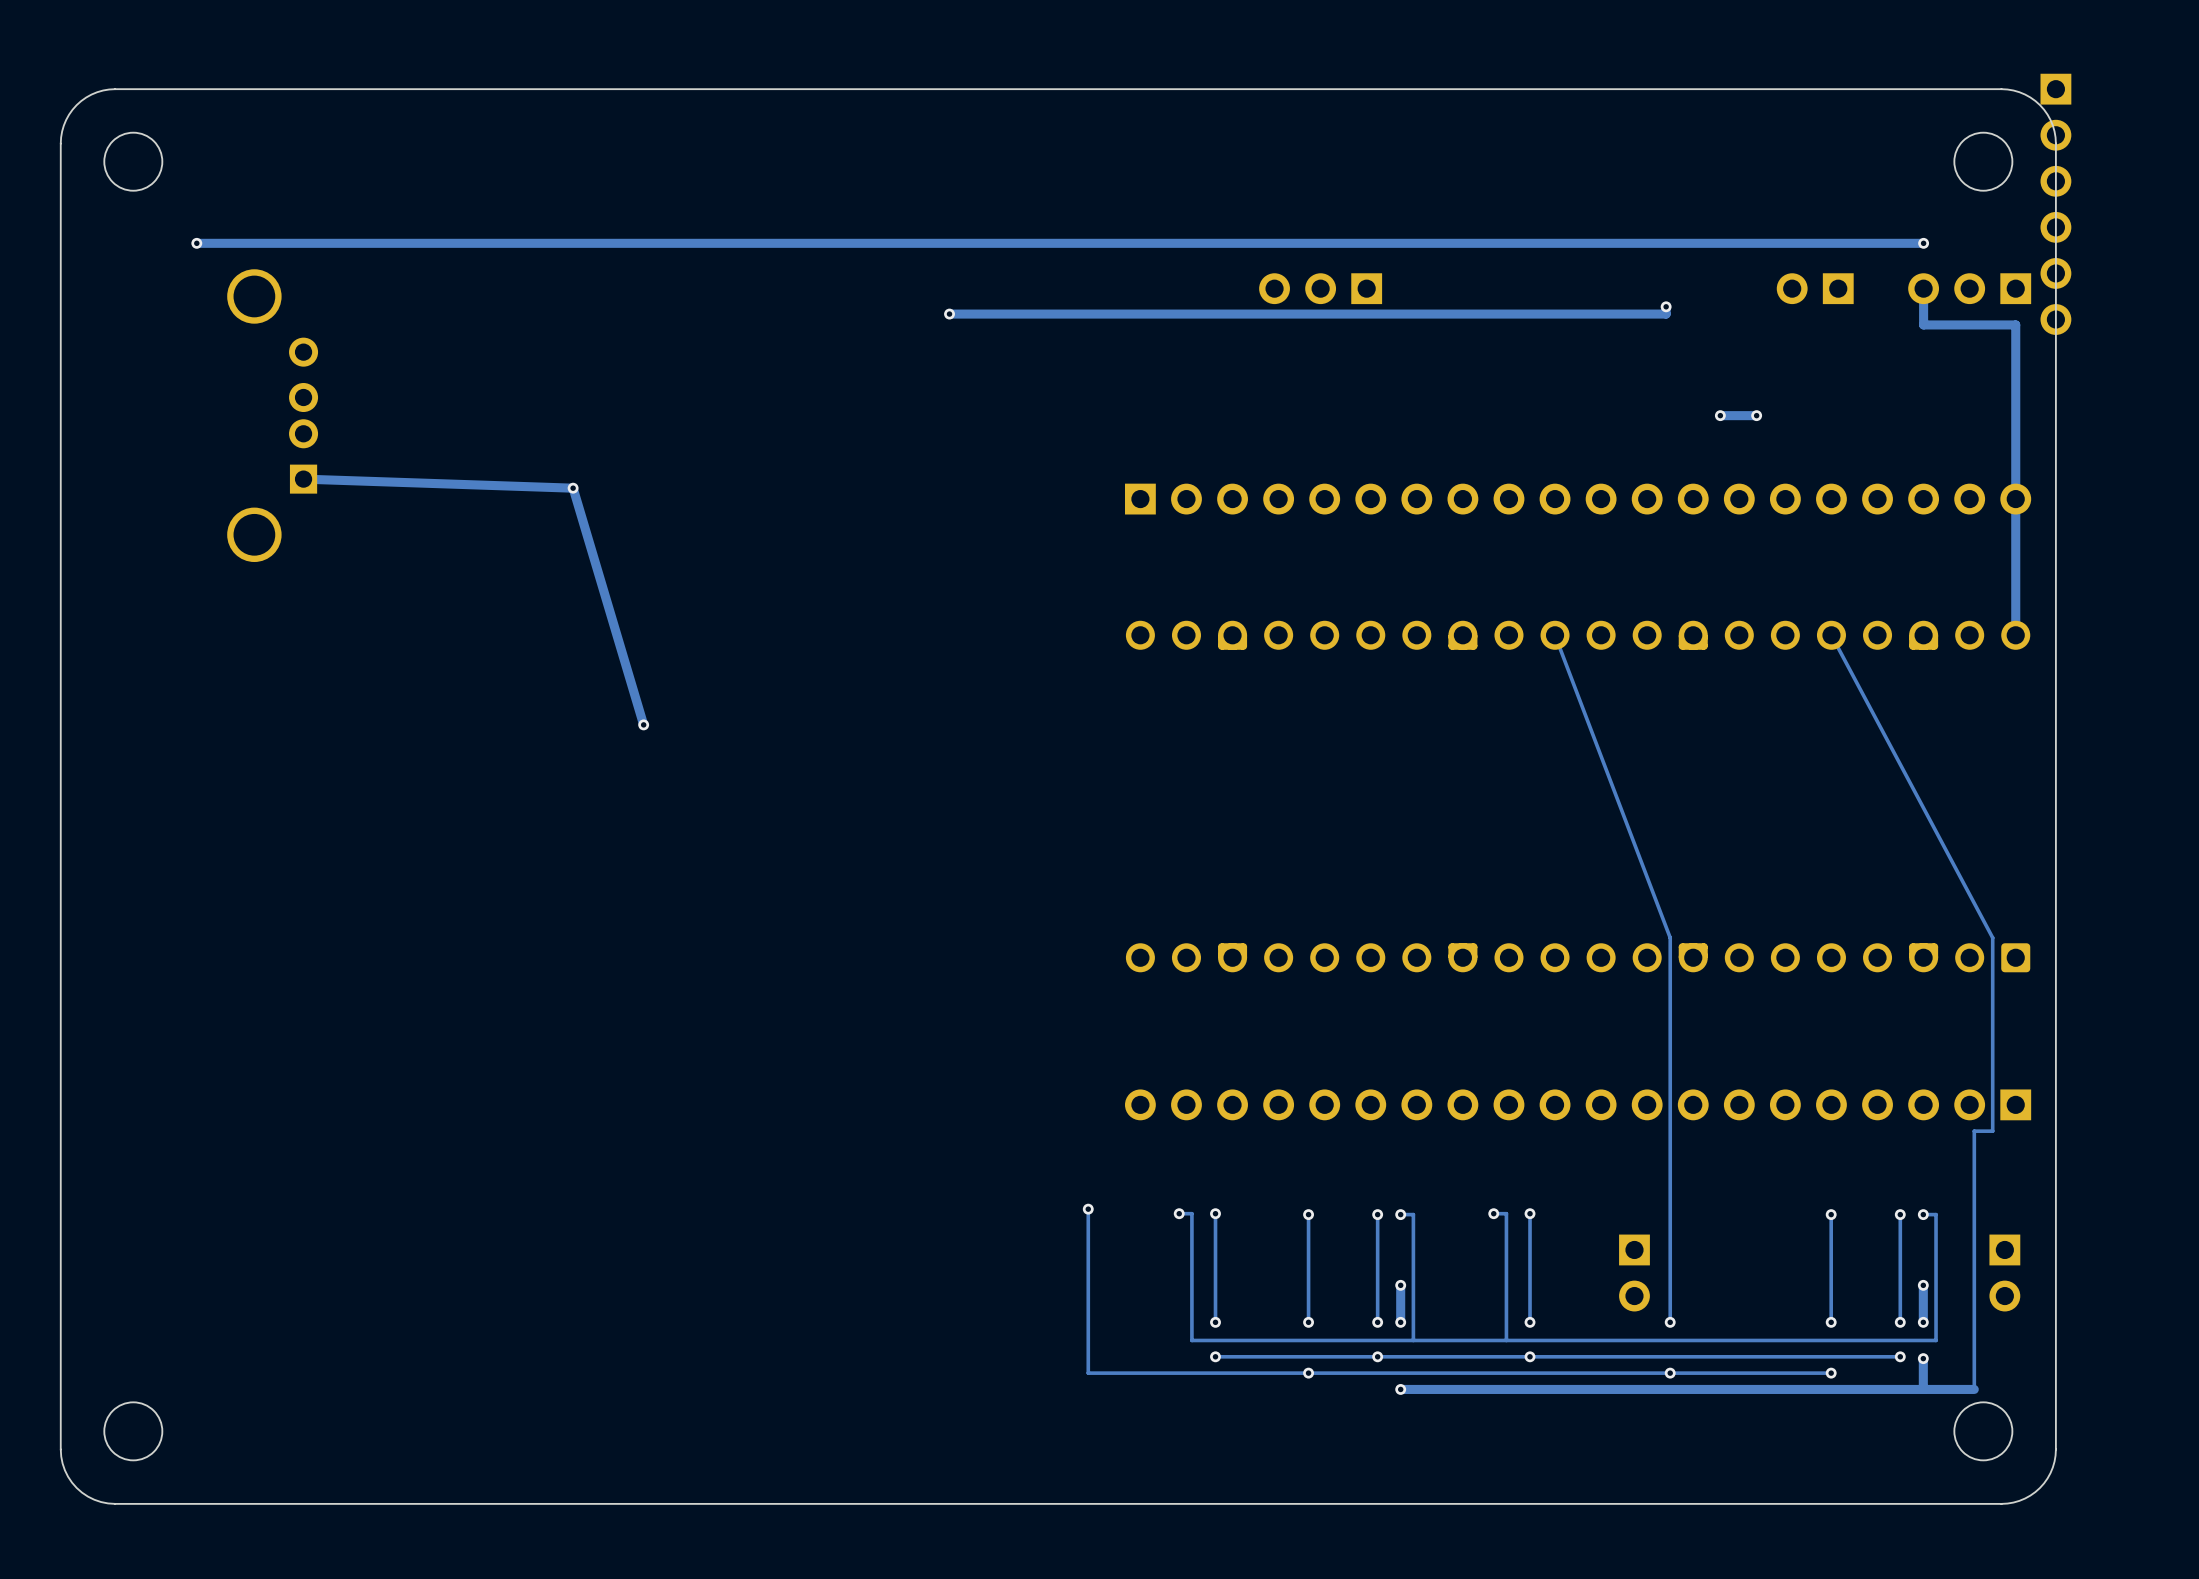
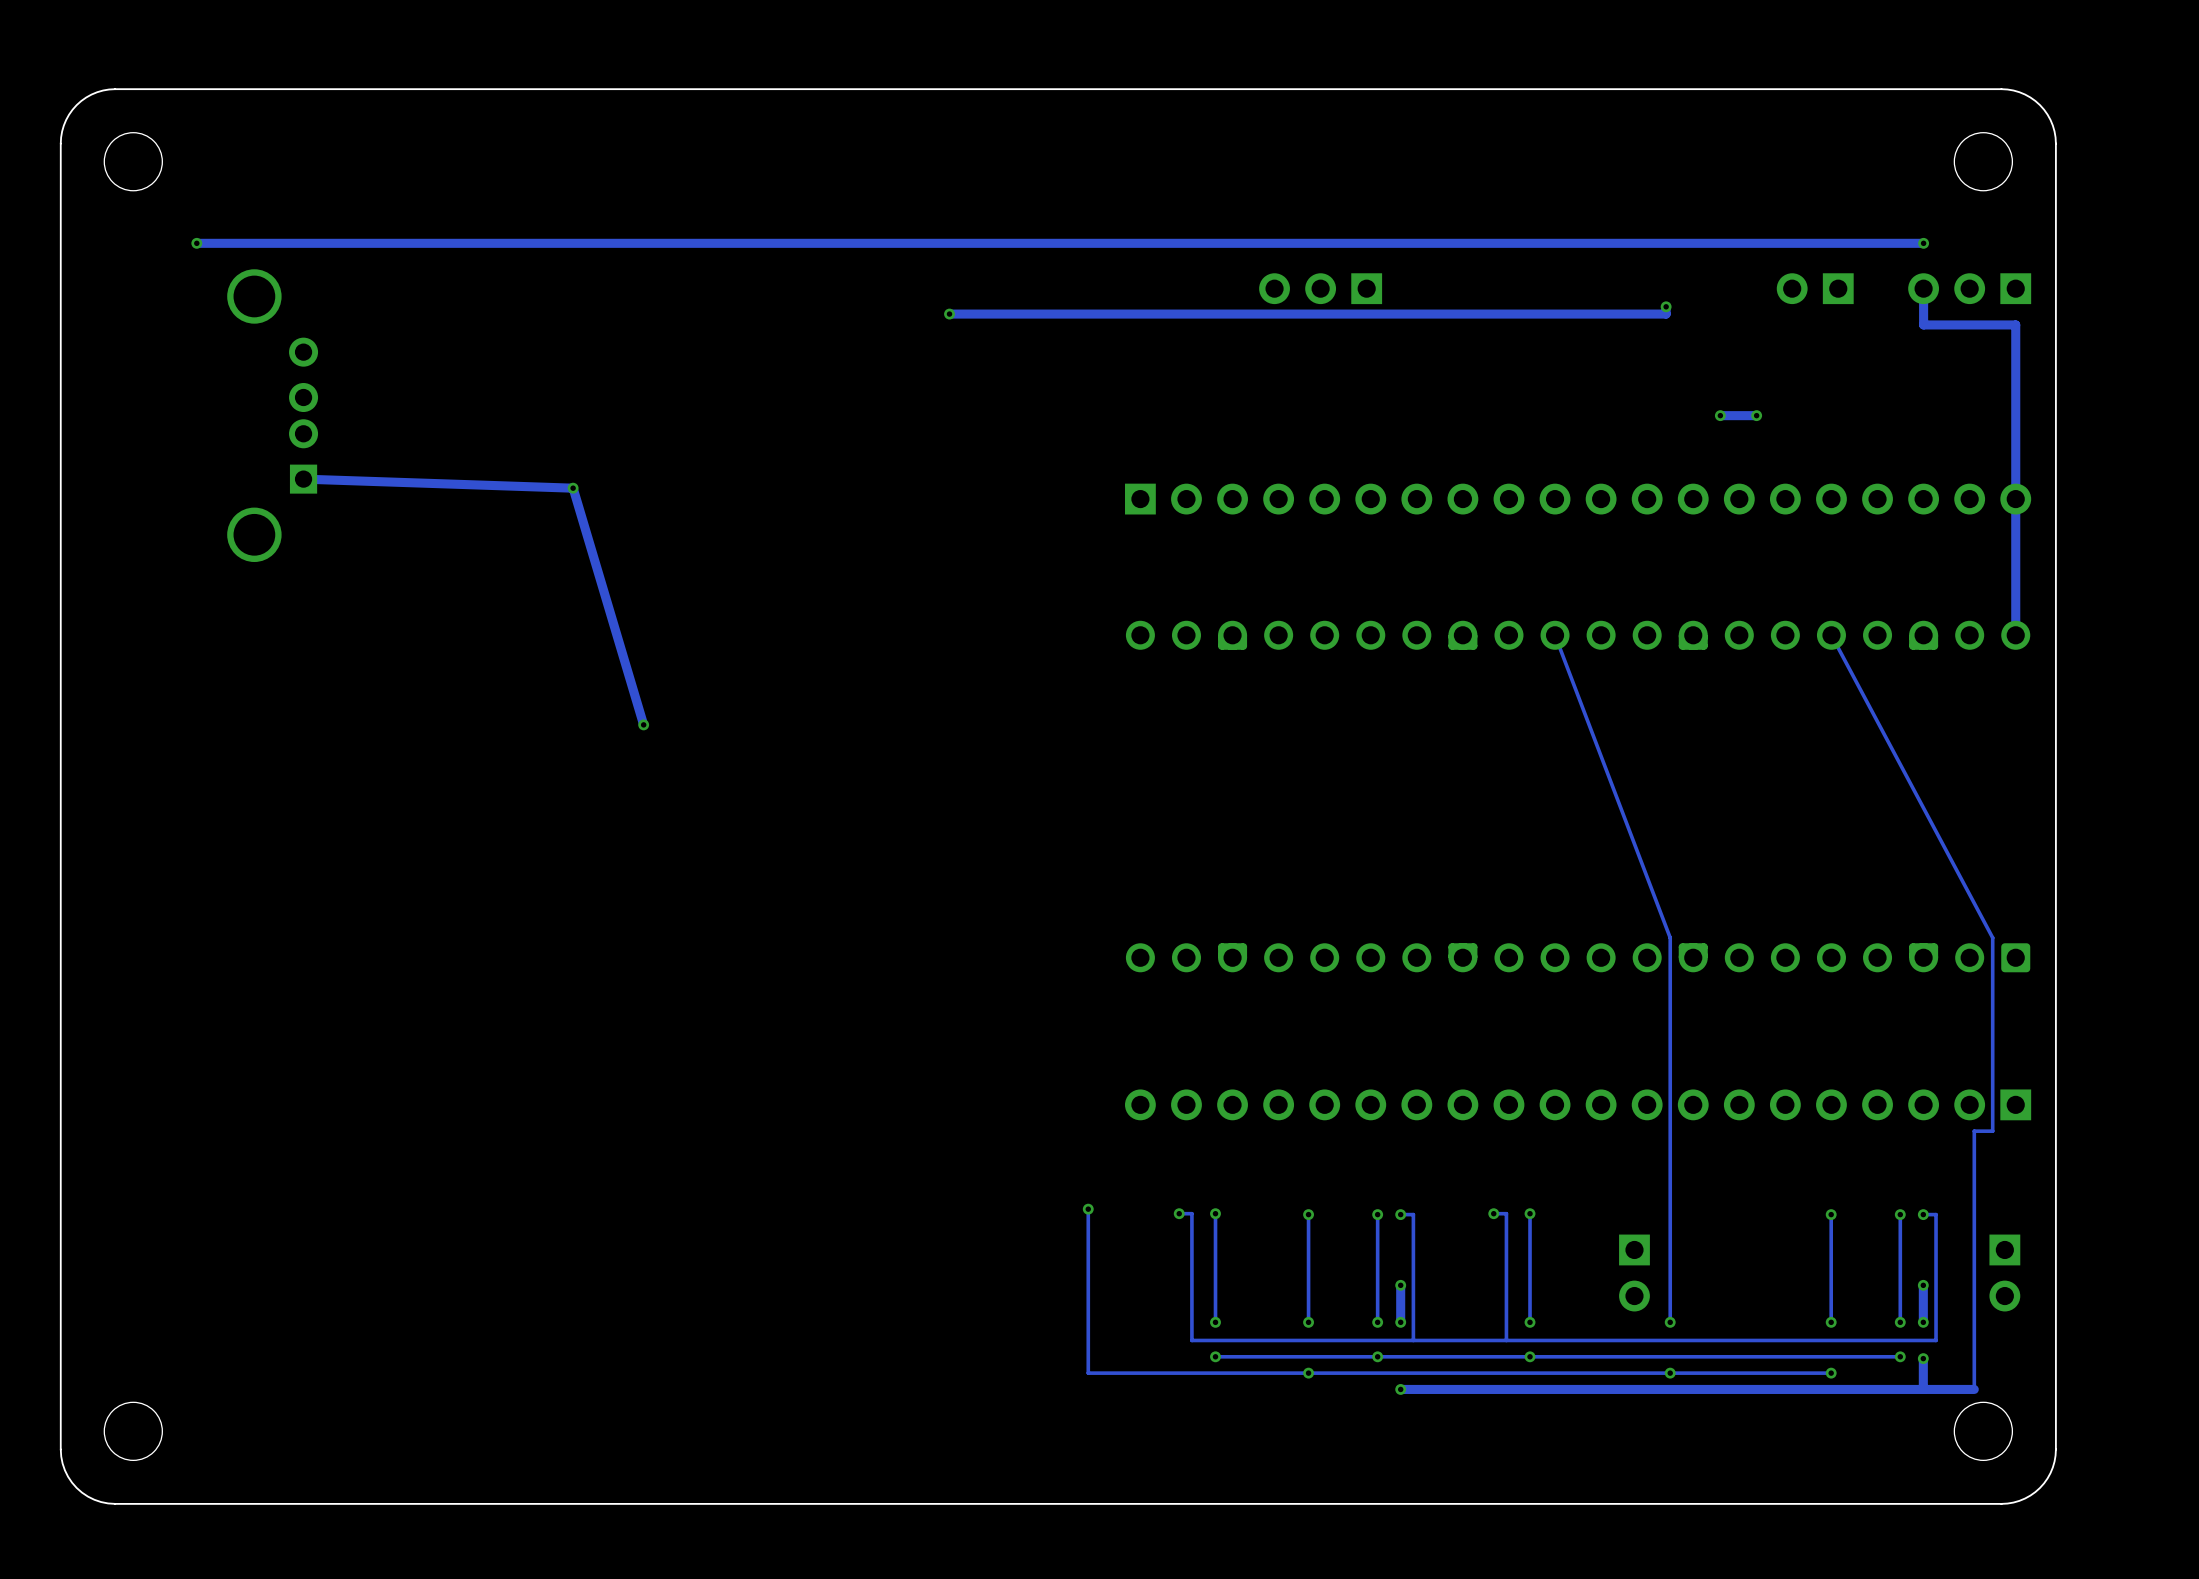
part: (2055, 204) -> none

